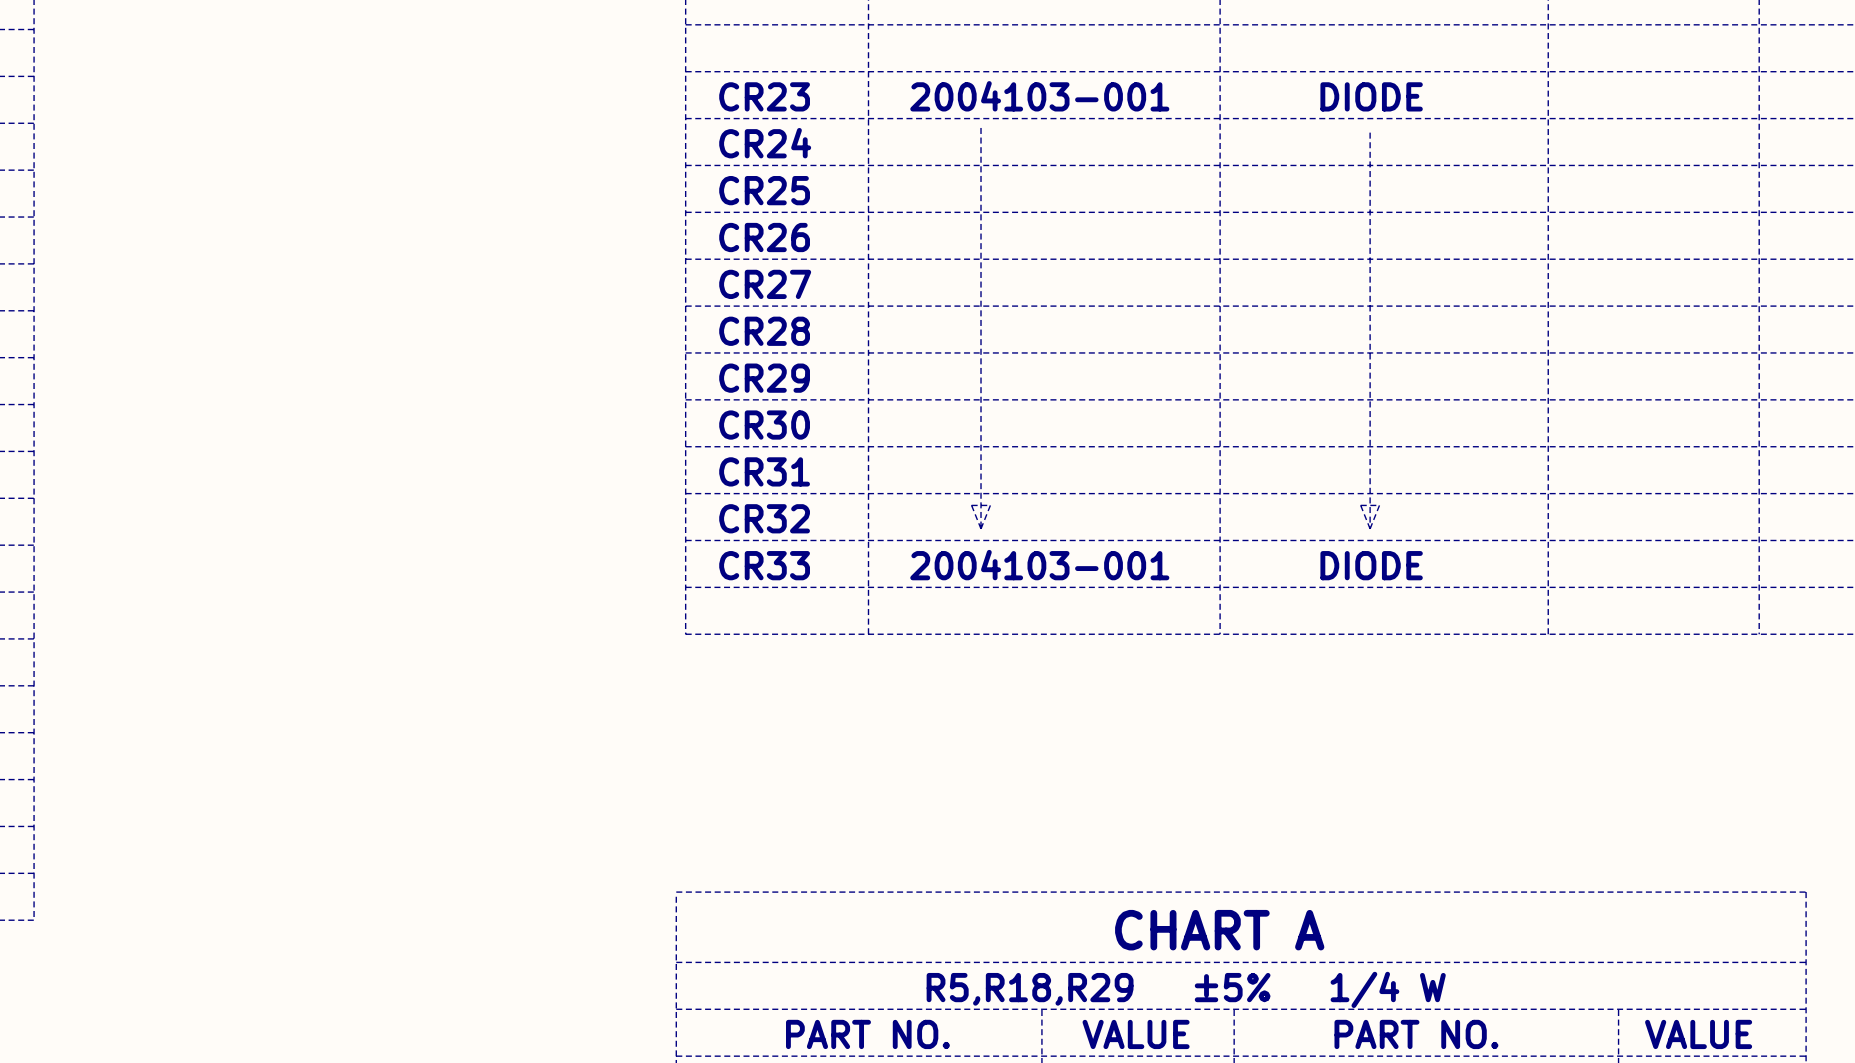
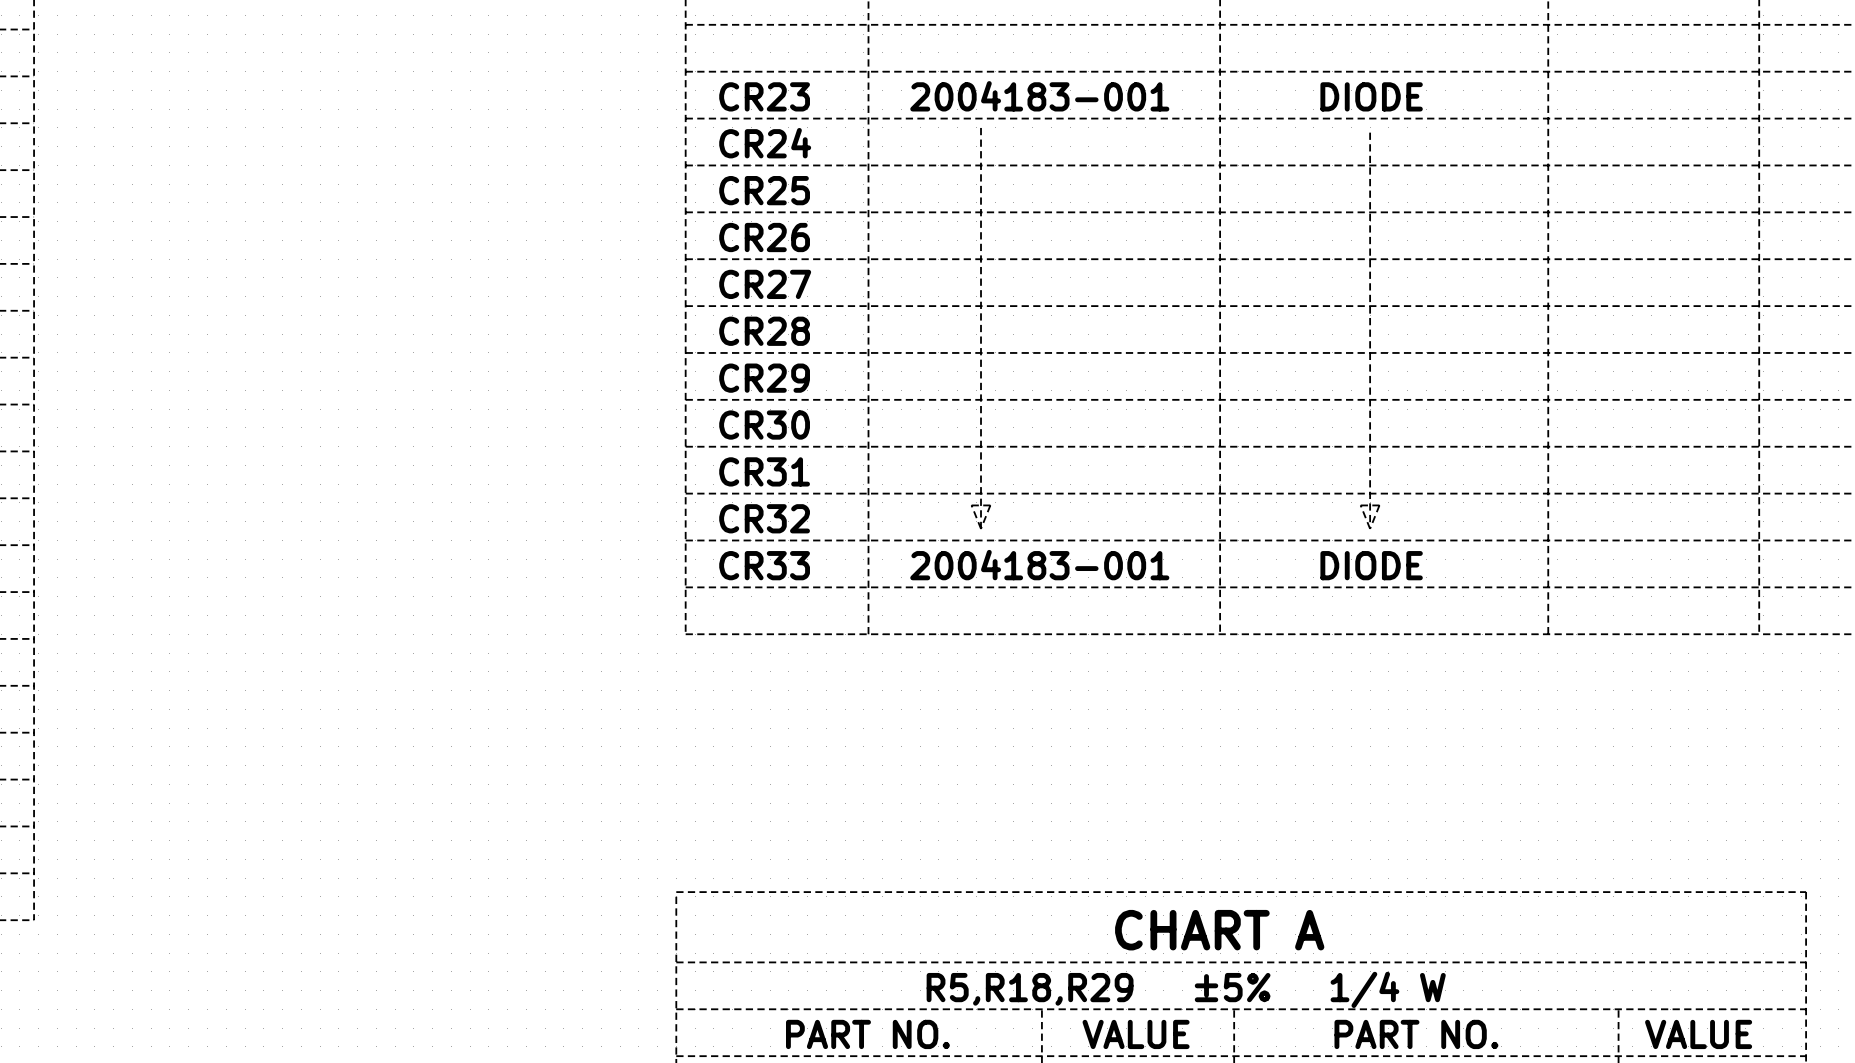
text: 2004103-001 (1039, 96) -> 2004183-001 (1039, 96)
text: 2004103-001 (1039, 565) -> 2004183-001 (1039, 565)

